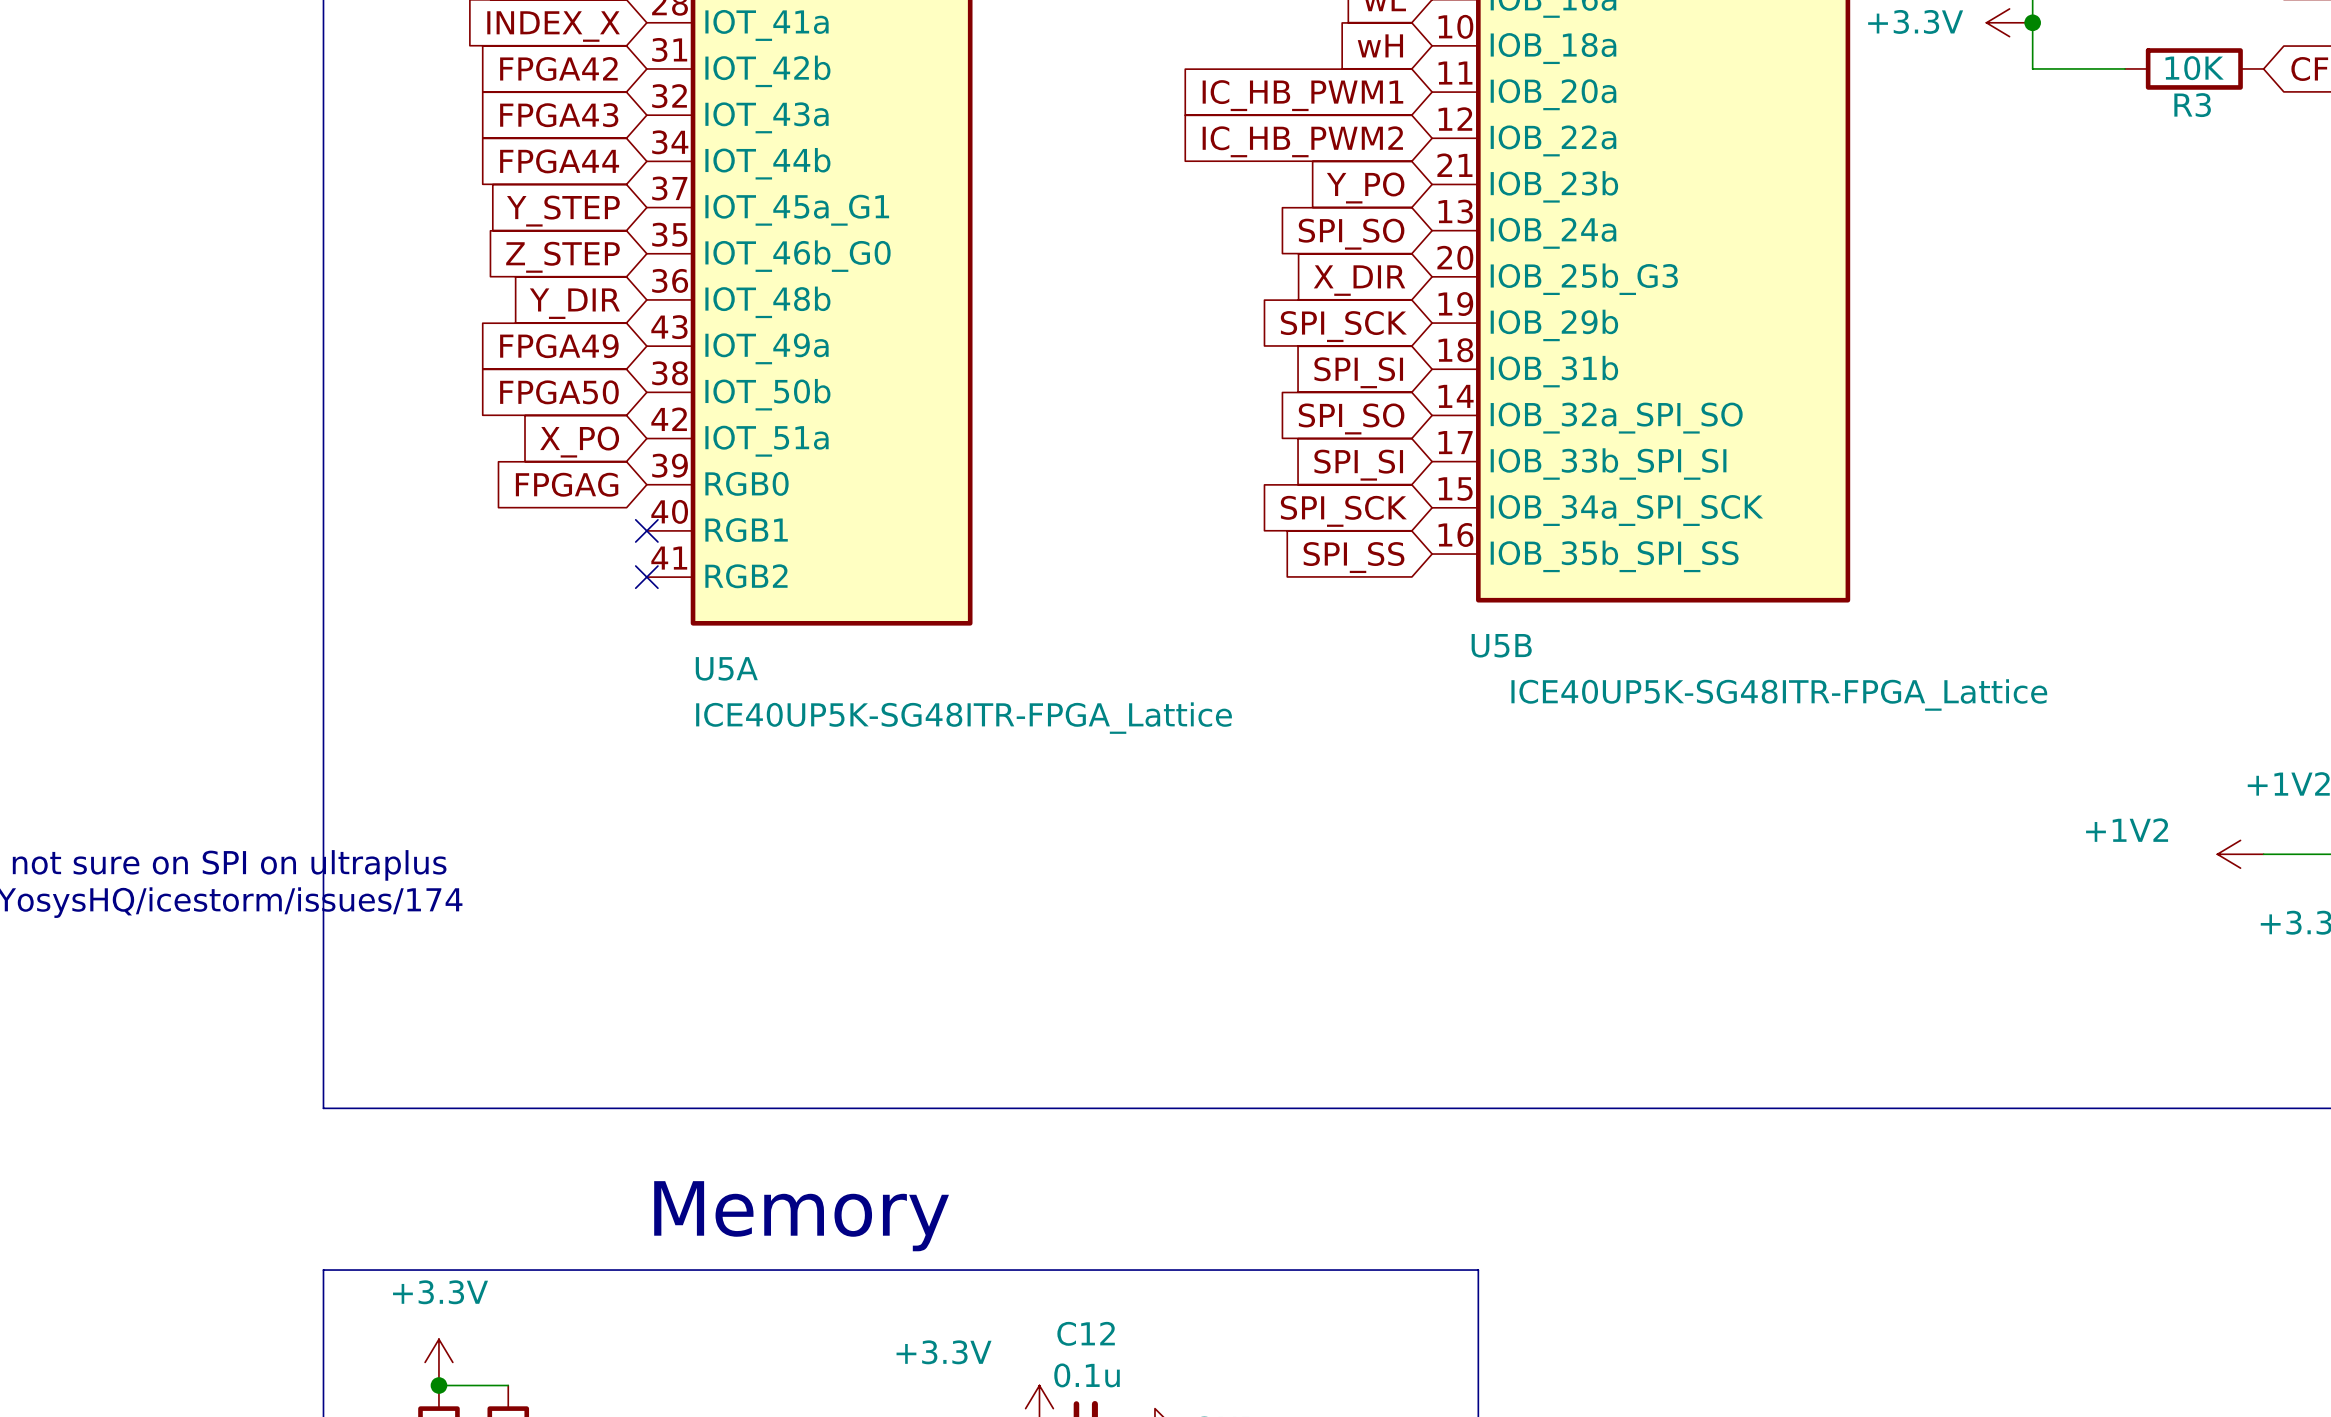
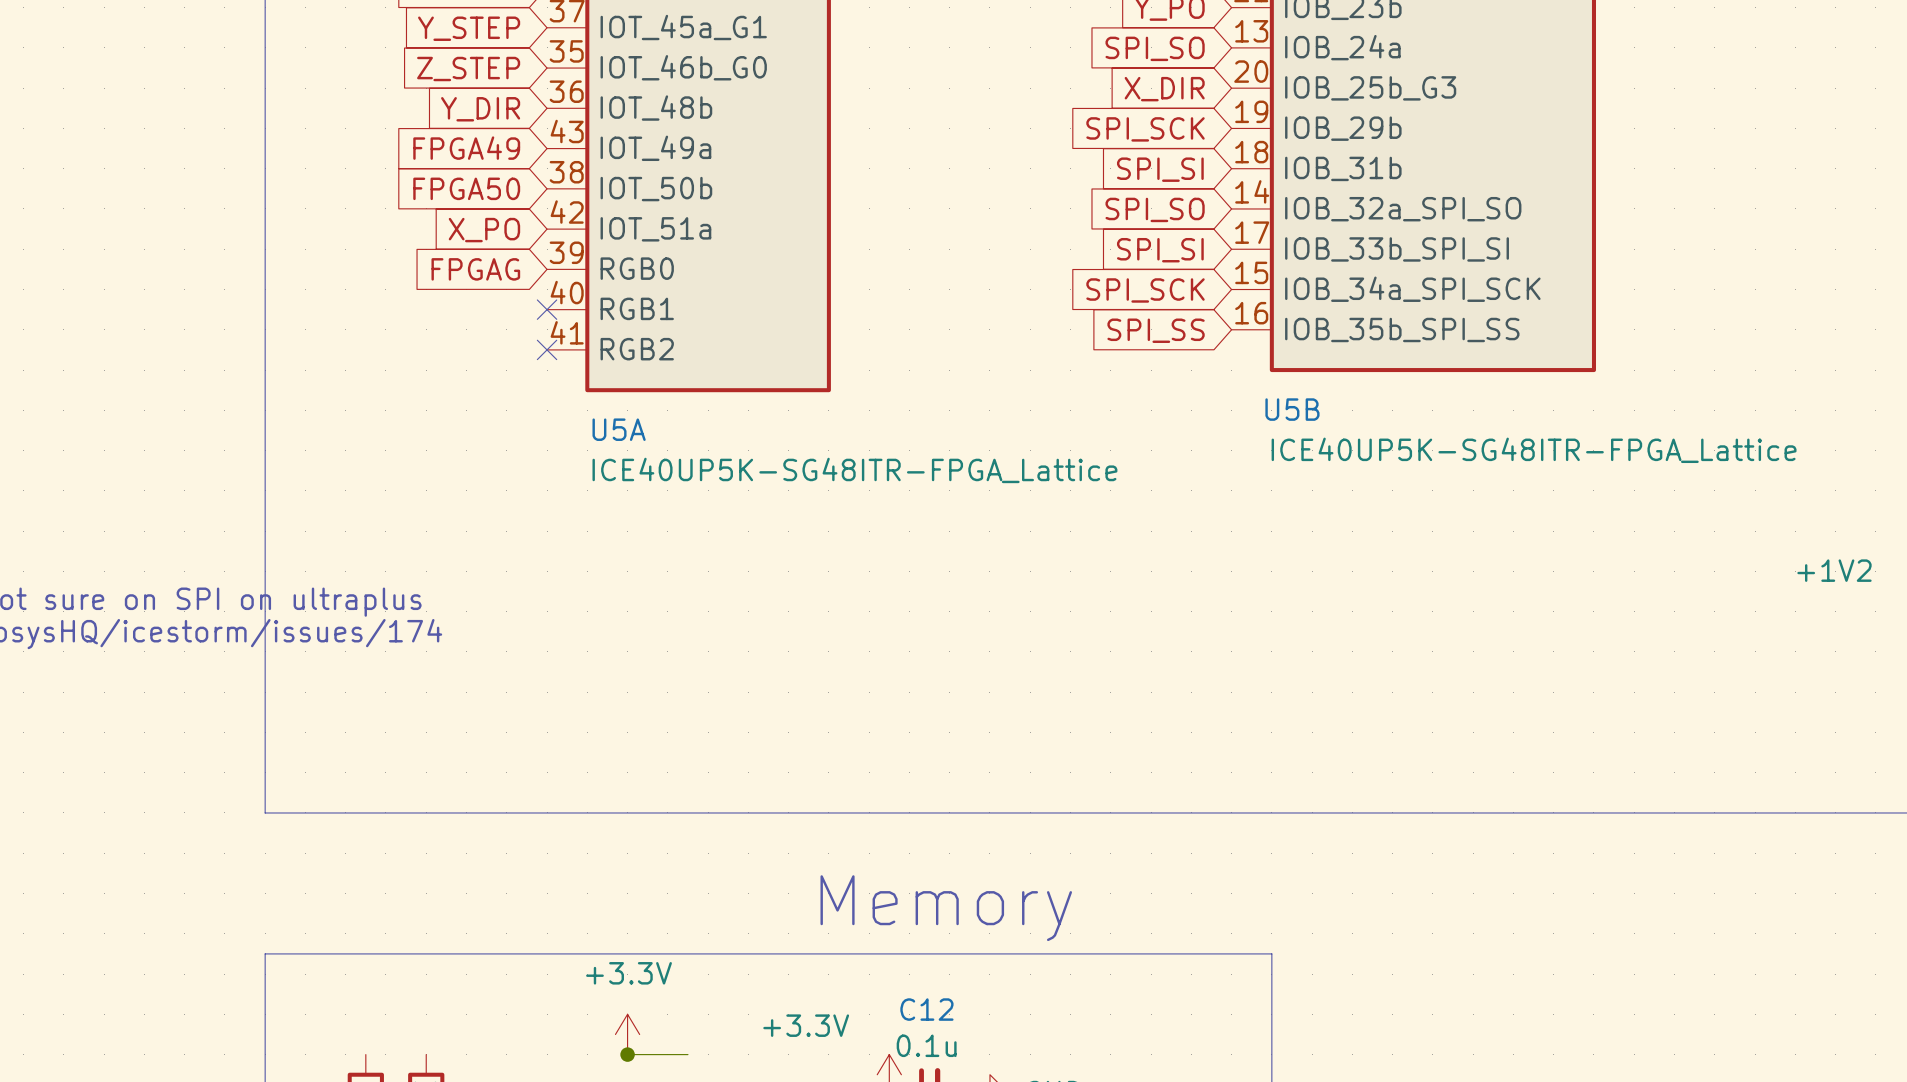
text position: Memory (801, 1216) -> Memory (946, 908)
power symbol position: +3.3V (438, 1362) -> +3.3V (627, 1034)
wire: (438, 1385) (508, 1385) -> (627, 1054) (687, 1054)
junction: (438, 1385) -> none
junction: none -> (627, 1054)

